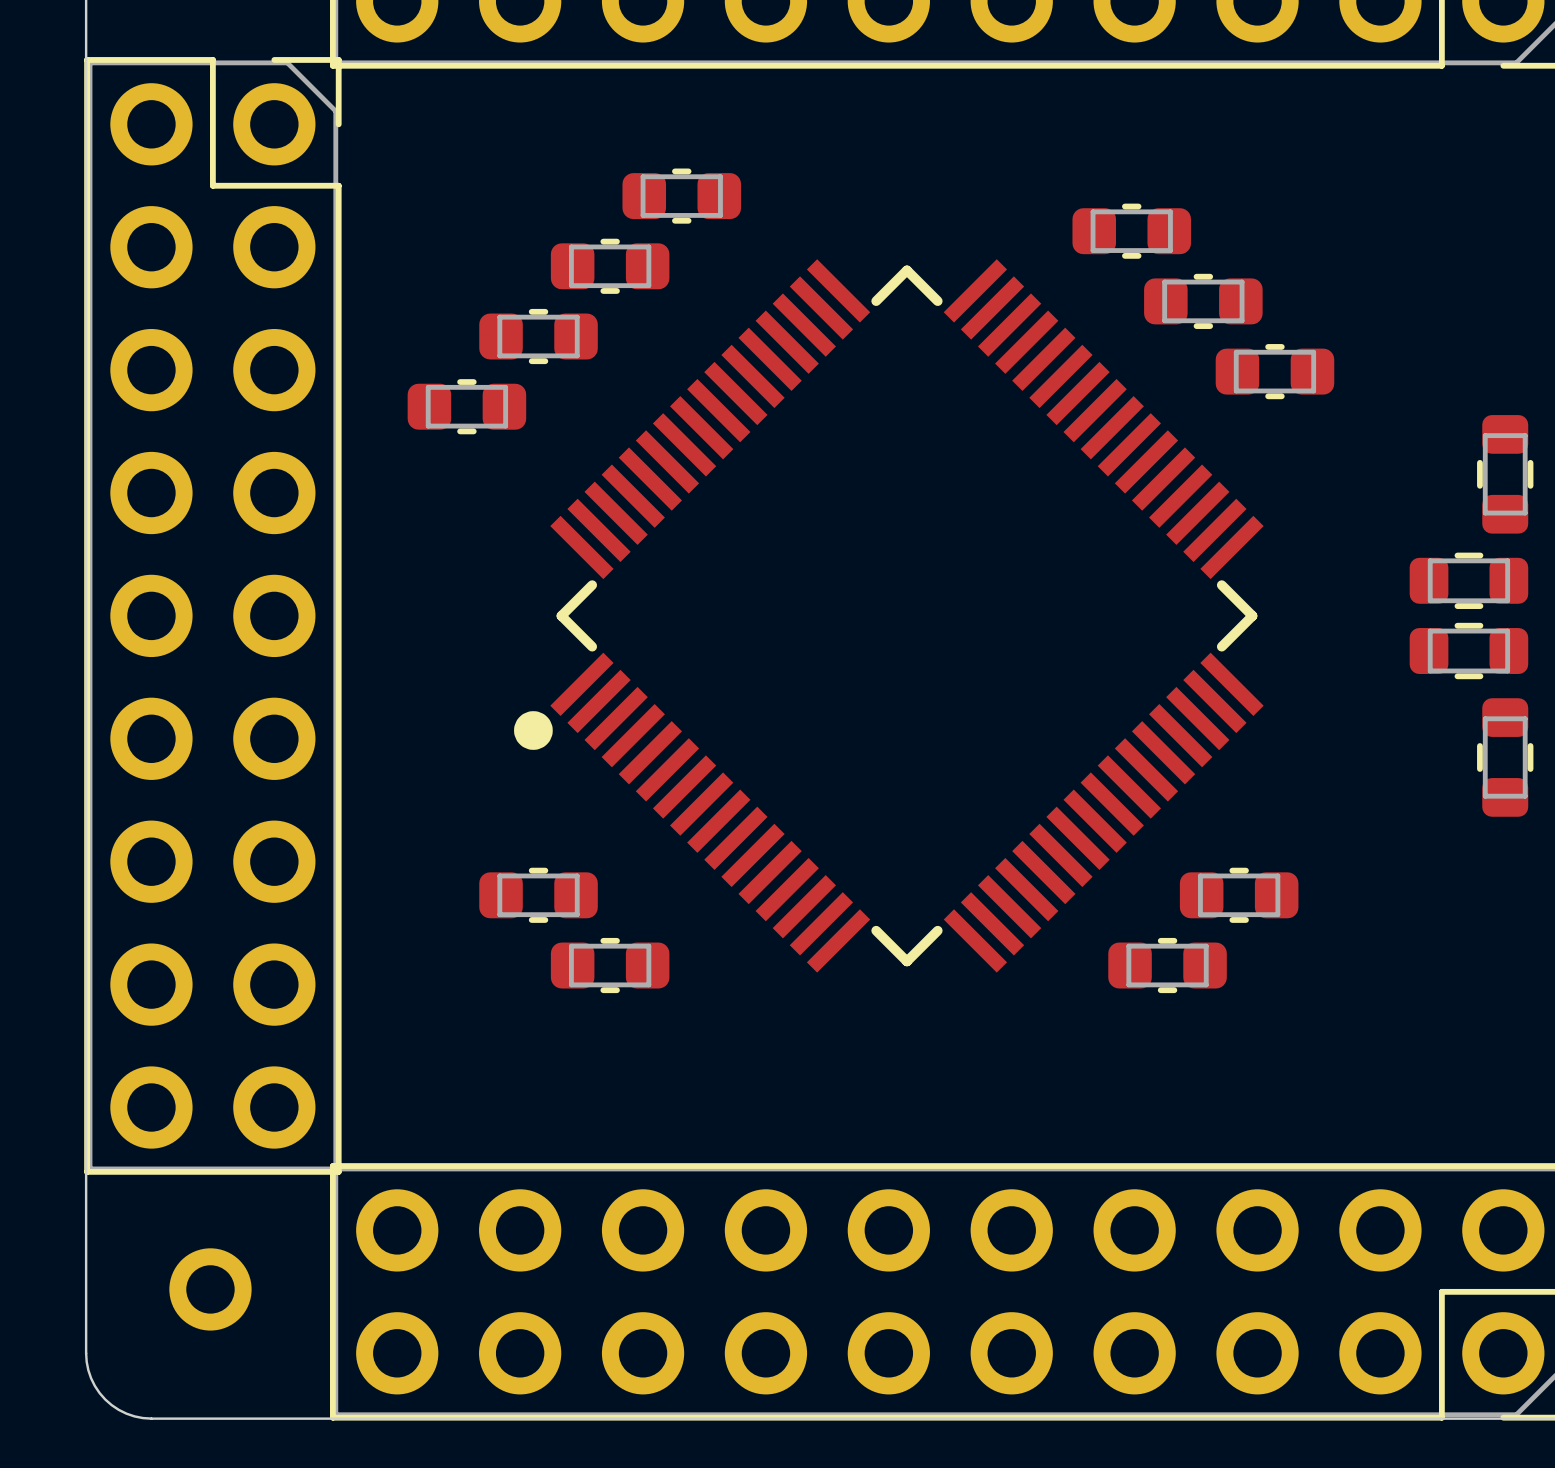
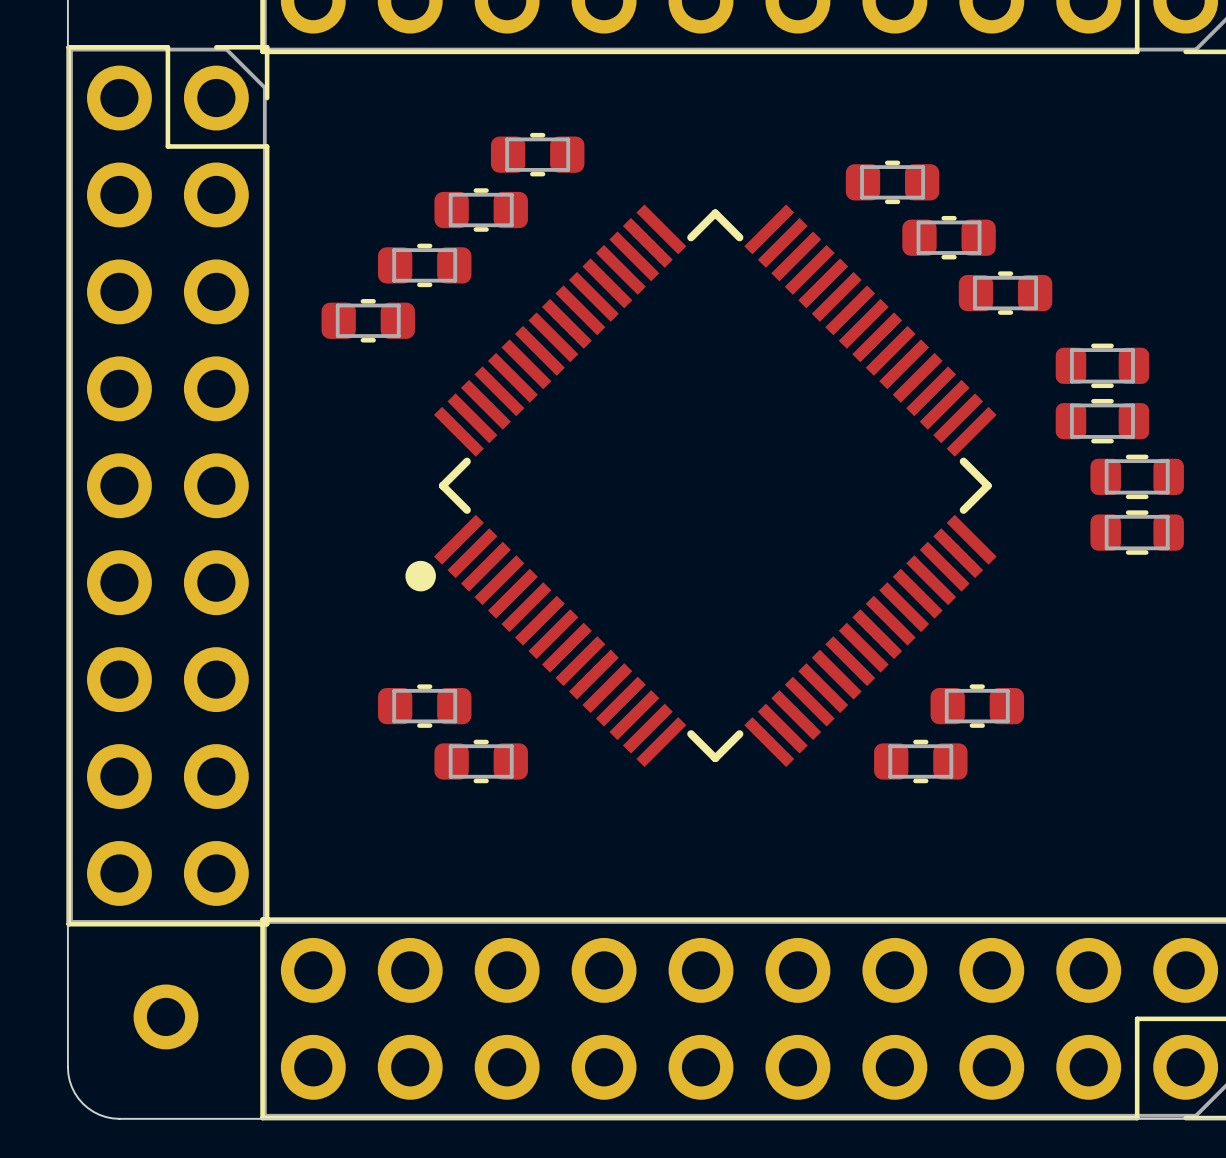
part: none -> (1102, 365)
part: (1505, 474) -> none
part: none -> (1102, 421)
part: (1468, 580) -> none
part: none -> (1137, 476)
part: (1468, 651) -> none
part: none -> (1137, 532)
part: (1505, 757) -> none

